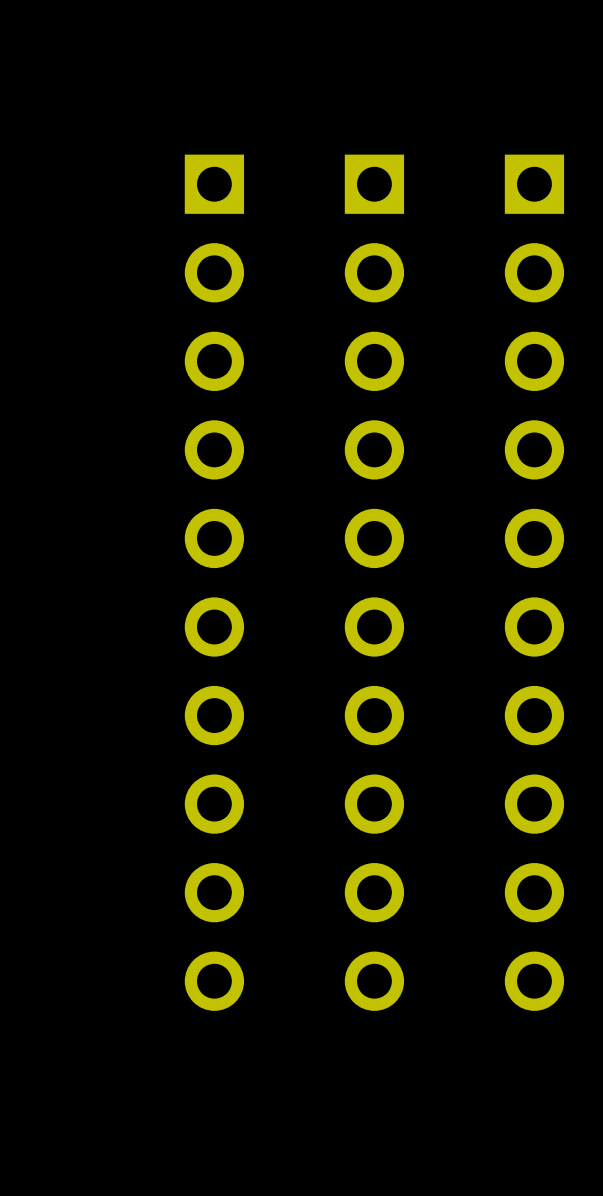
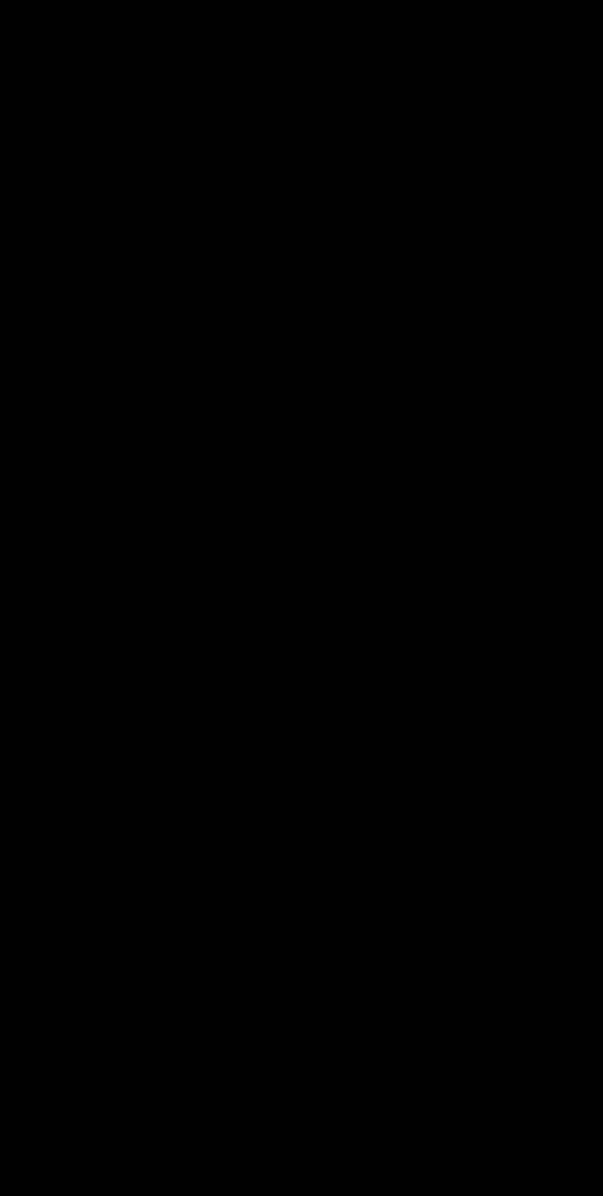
part: (214, 582) -> none
part: (374, 582) -> none
part: (534, 582) -> none

